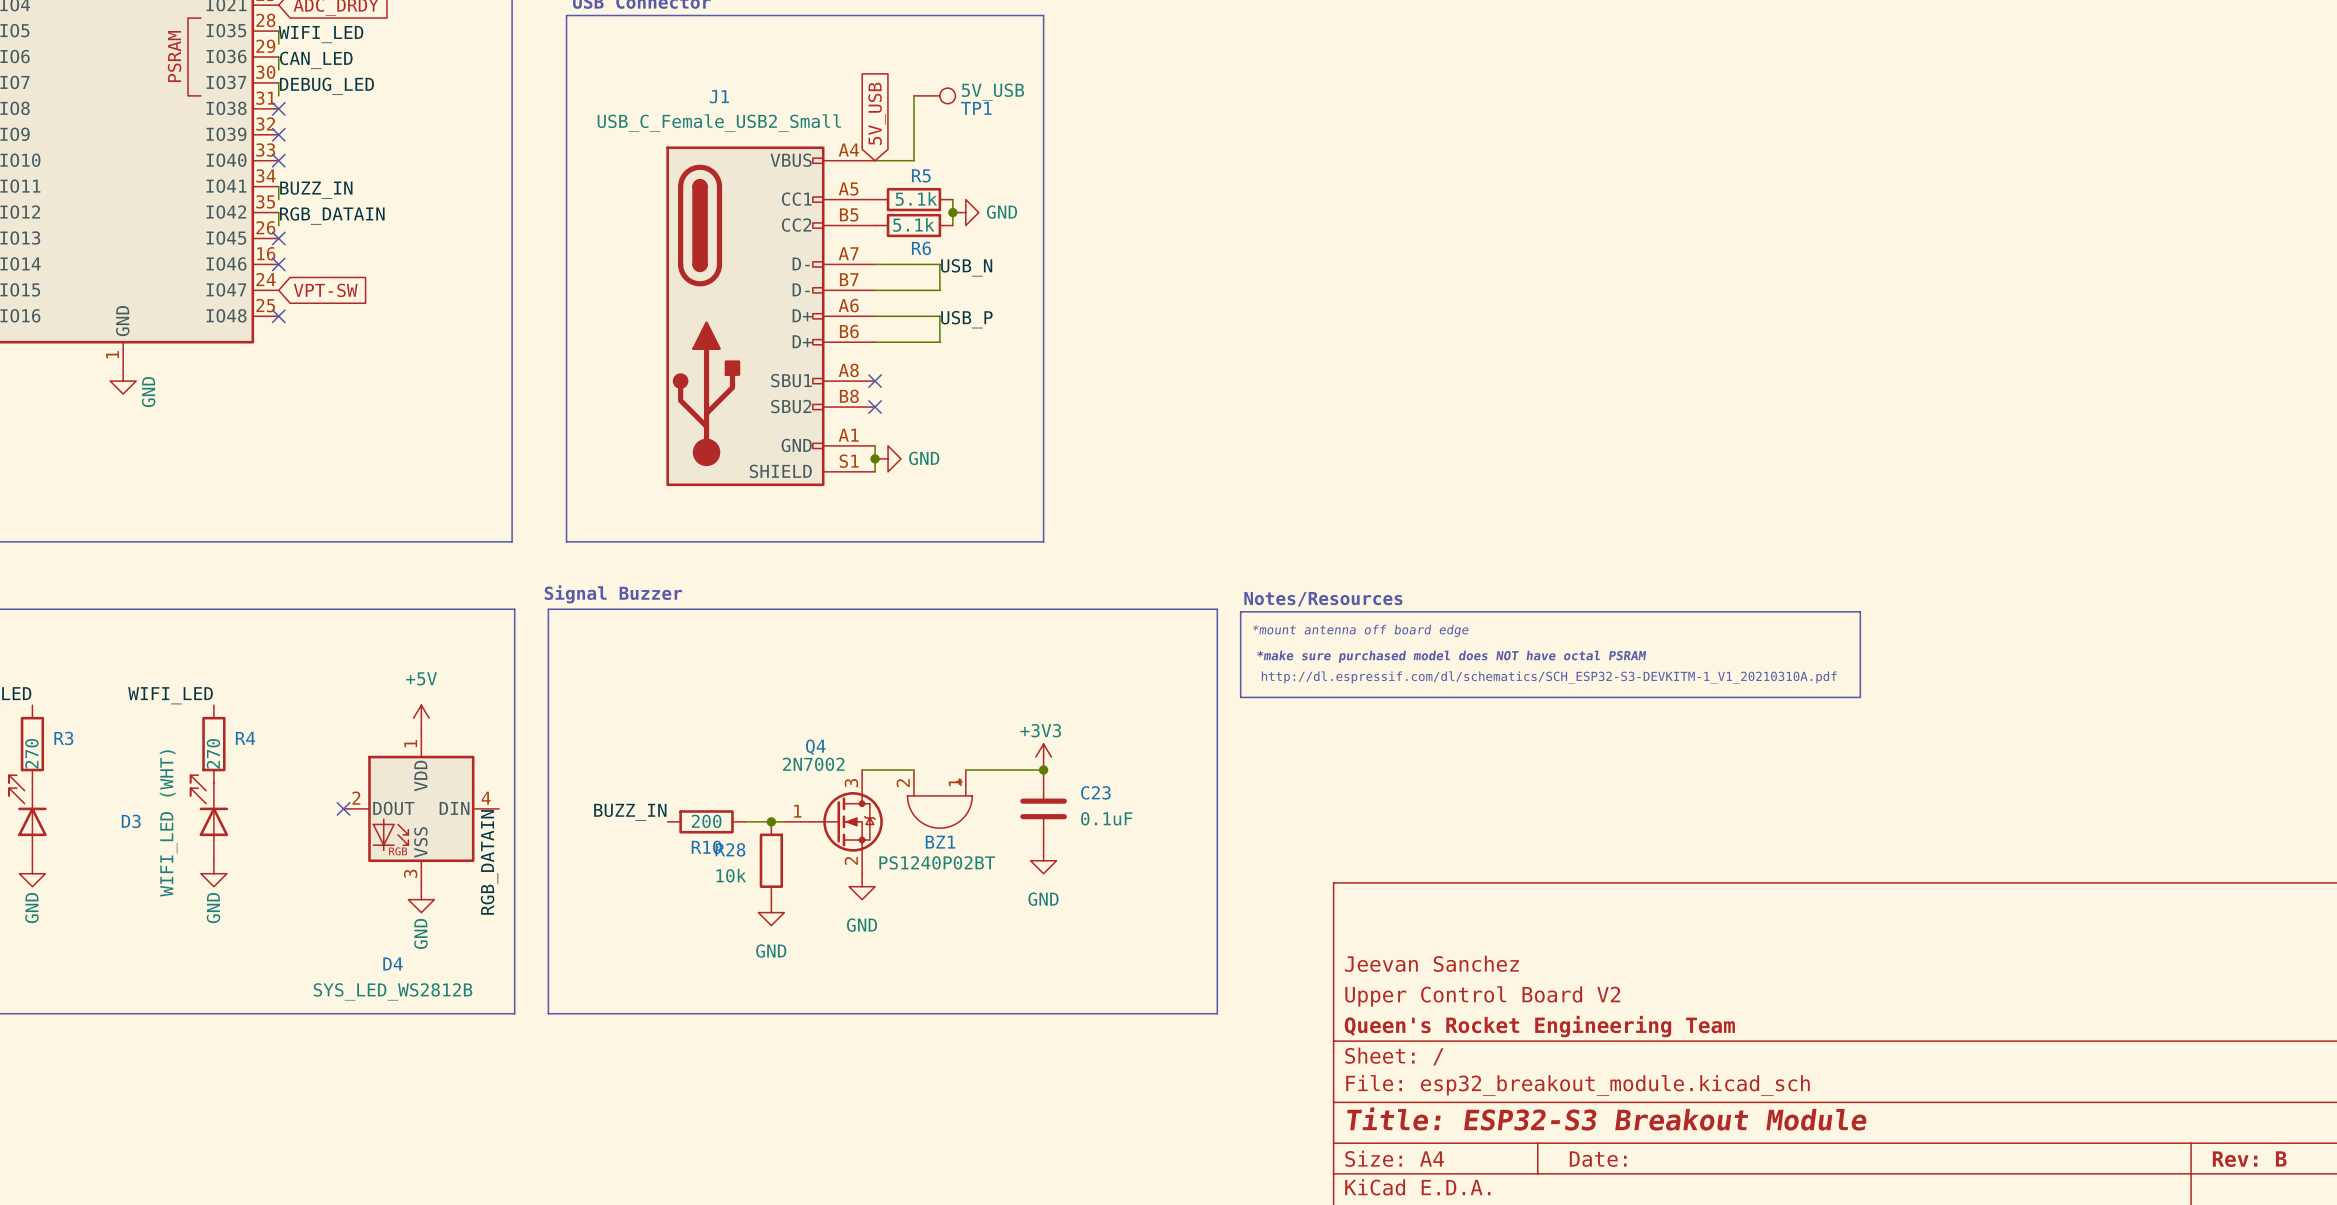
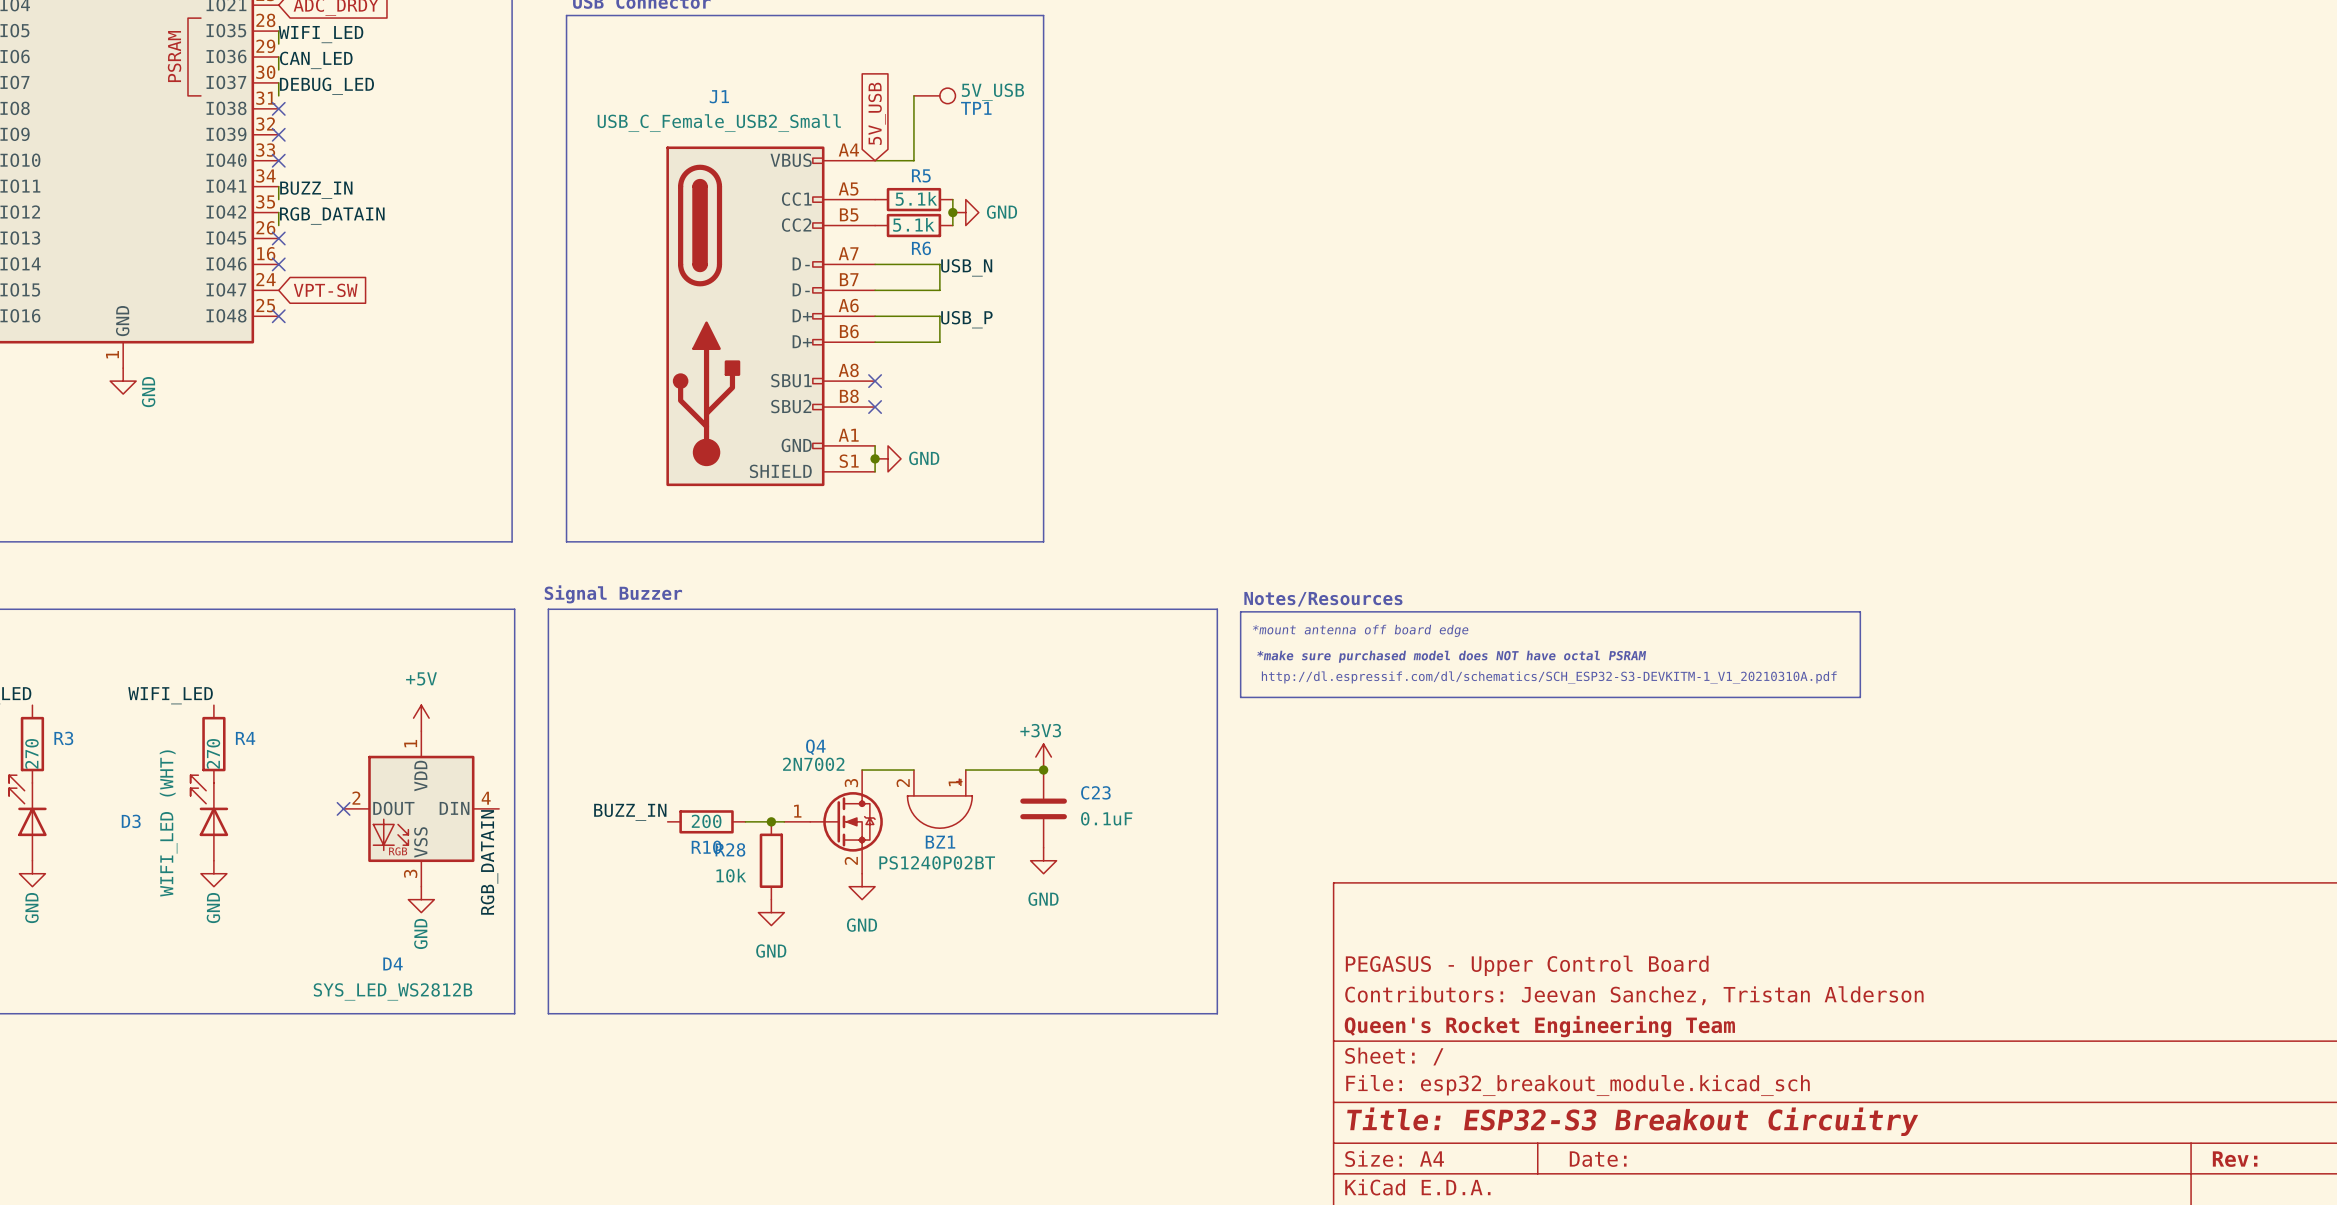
title block: Jeevan Sanchez (1431, 963) -> PEGASUS - Upper Control Board (1527, 965)
title block: Upper Control Board V2 (1482, 996) -> Contributors: Jeevan Sanchez, Tristan Alderson (1634, 995)
title block: Title: ESP32-S3 Breakout Module (1606, 1119) -> Title: ESP32-S3 Breakout Circuitry (1632, 1121)
title block: Rev: B (2249, 1159) -> Rev: (2235, 1159)

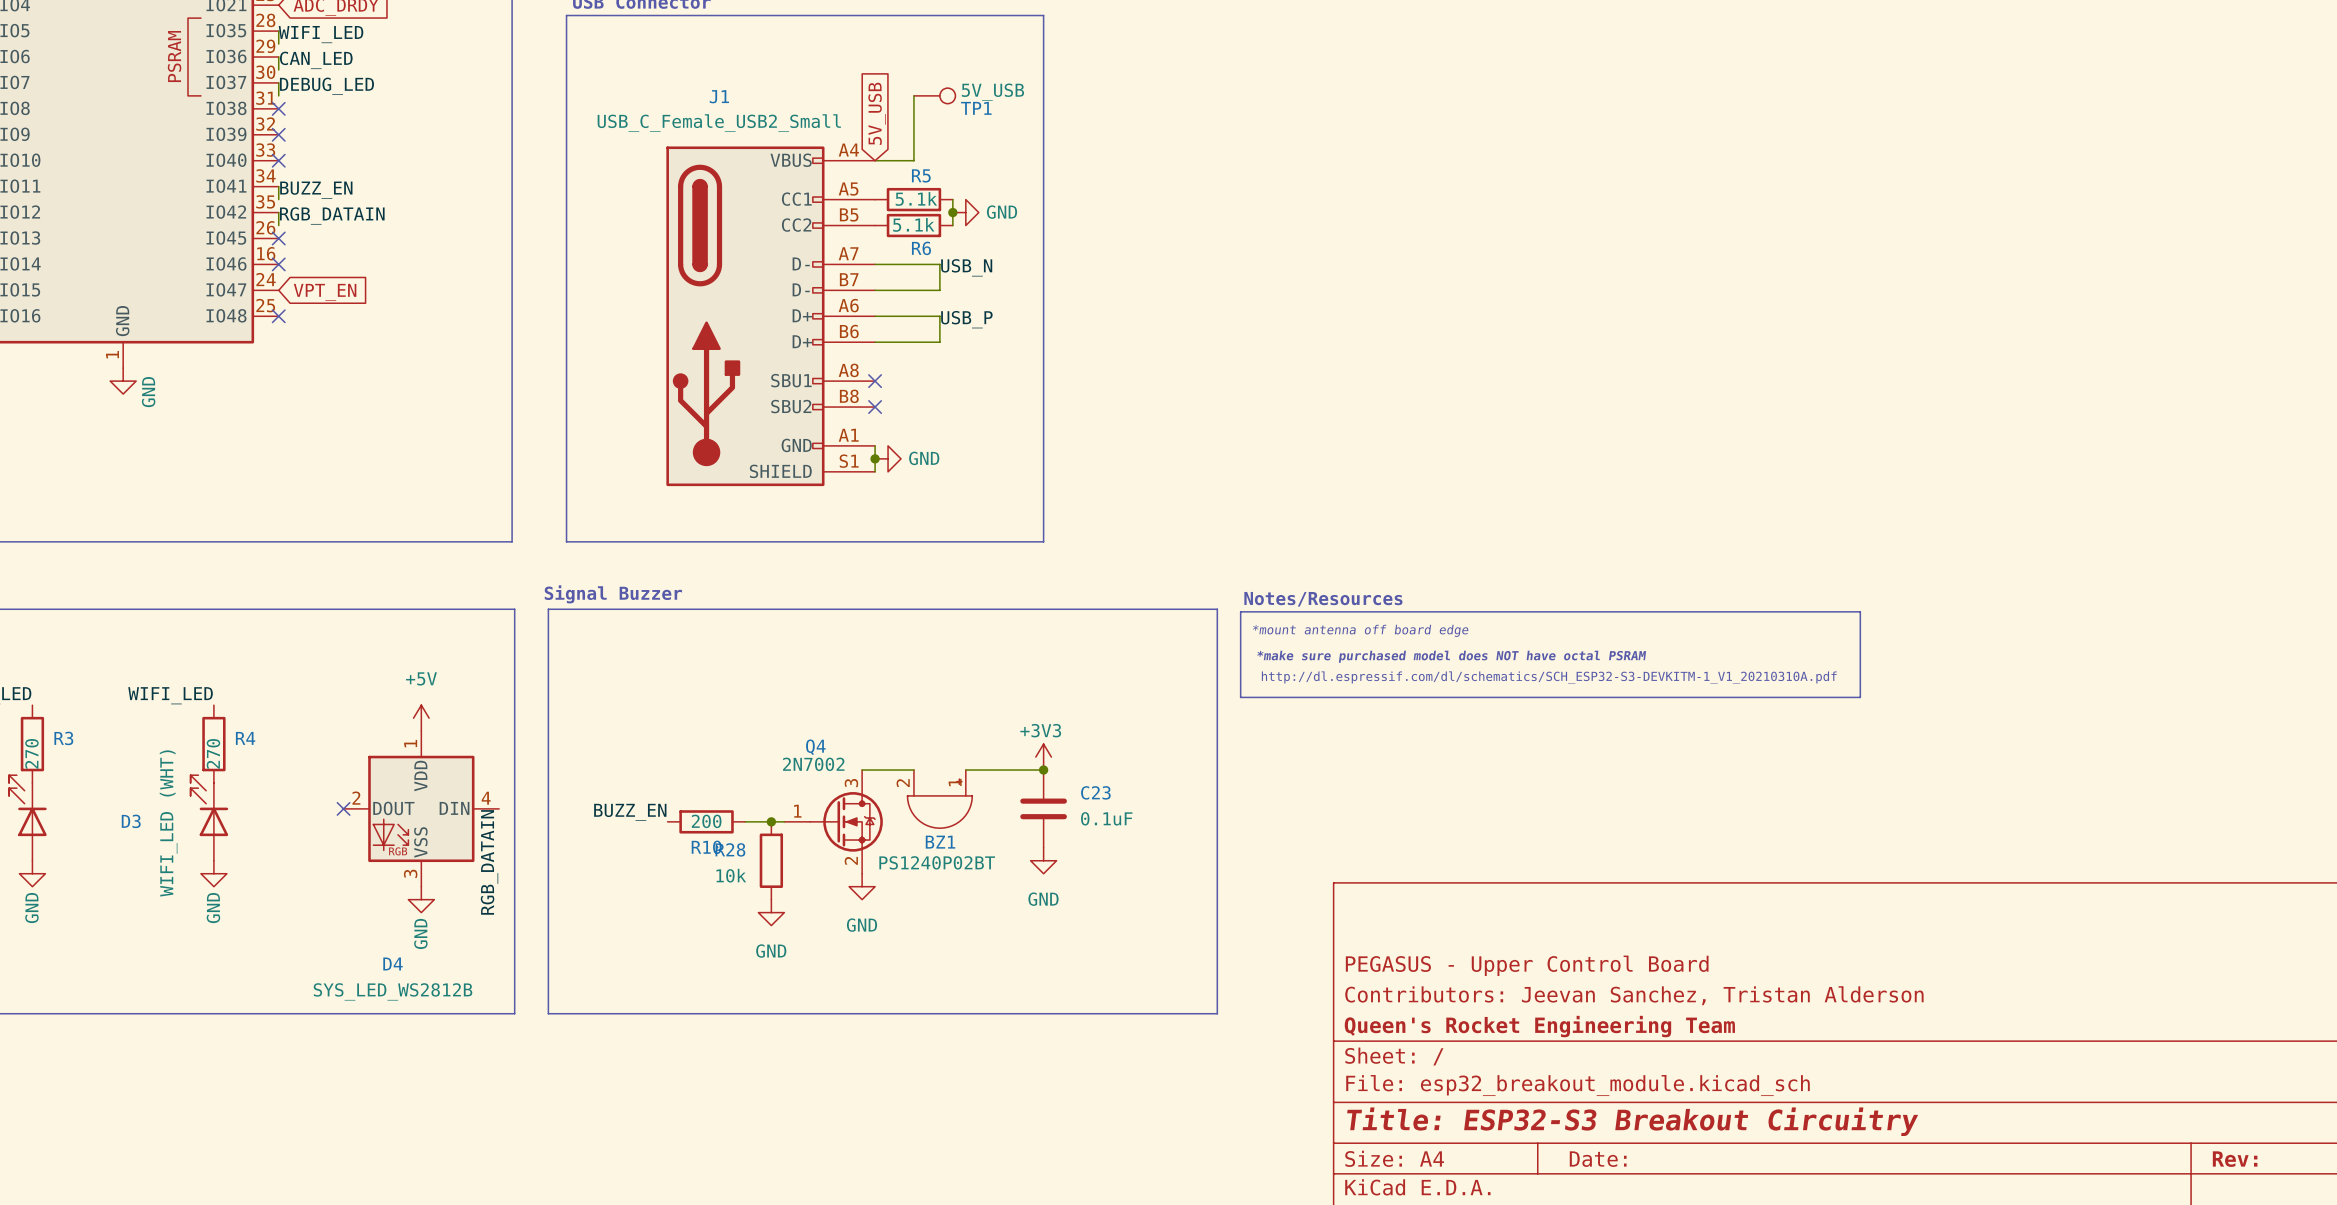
label: BUZZ_IN (316, 190) -> BUZZ_EN (316, 190)
global label: VPT-SW (325, 290) -> VPT_EN (325, 292)
label: BUZZ_IN (630, 812) -> BUZZ_EN (630, 812)

